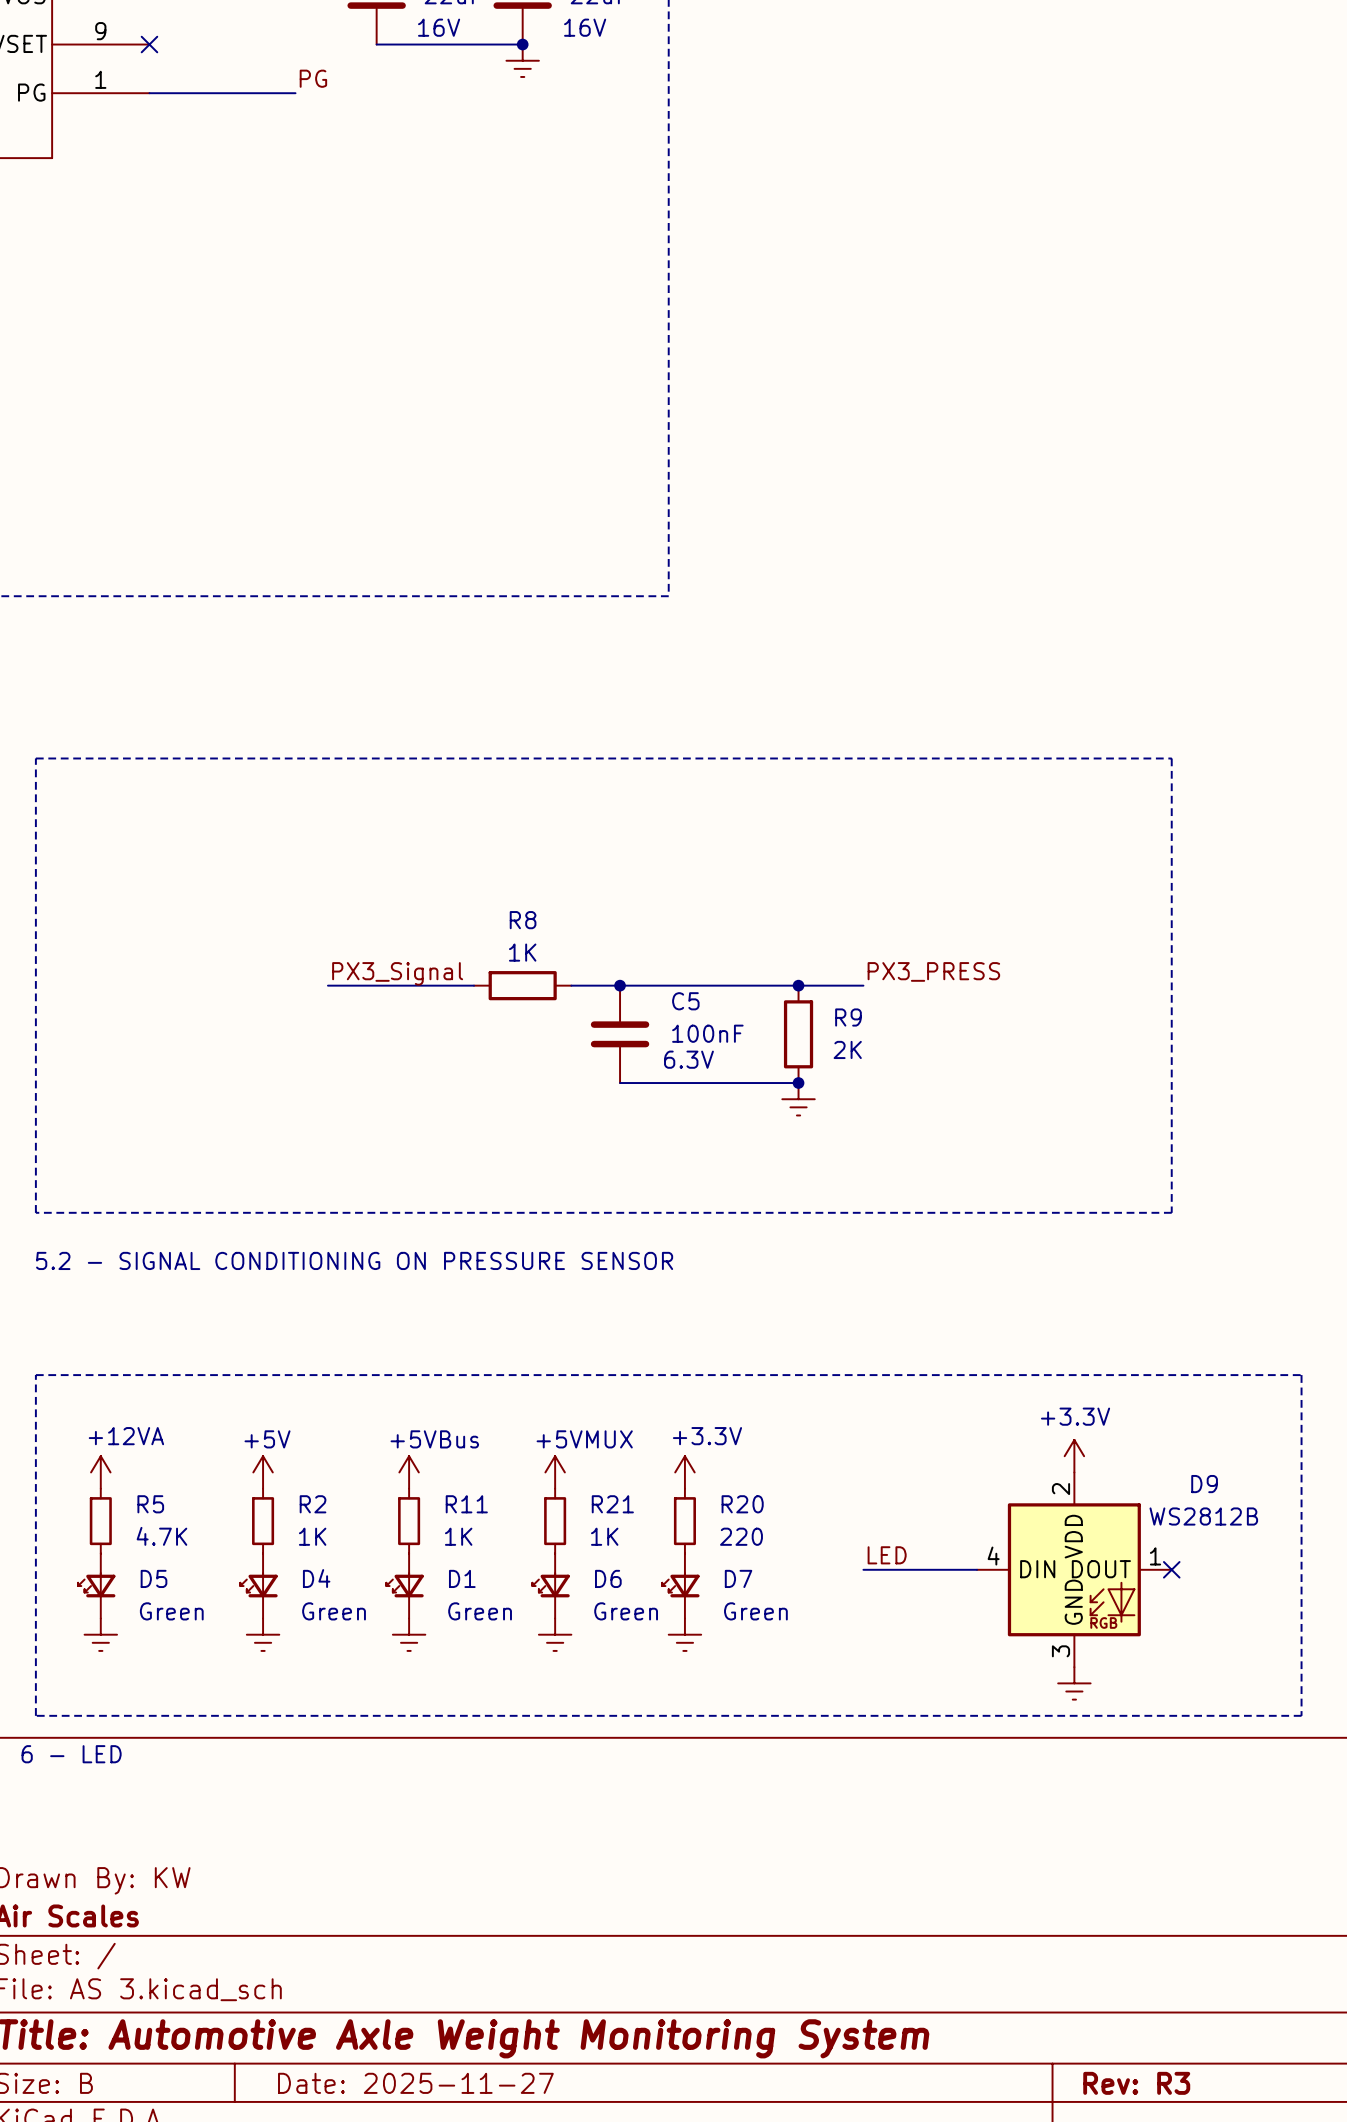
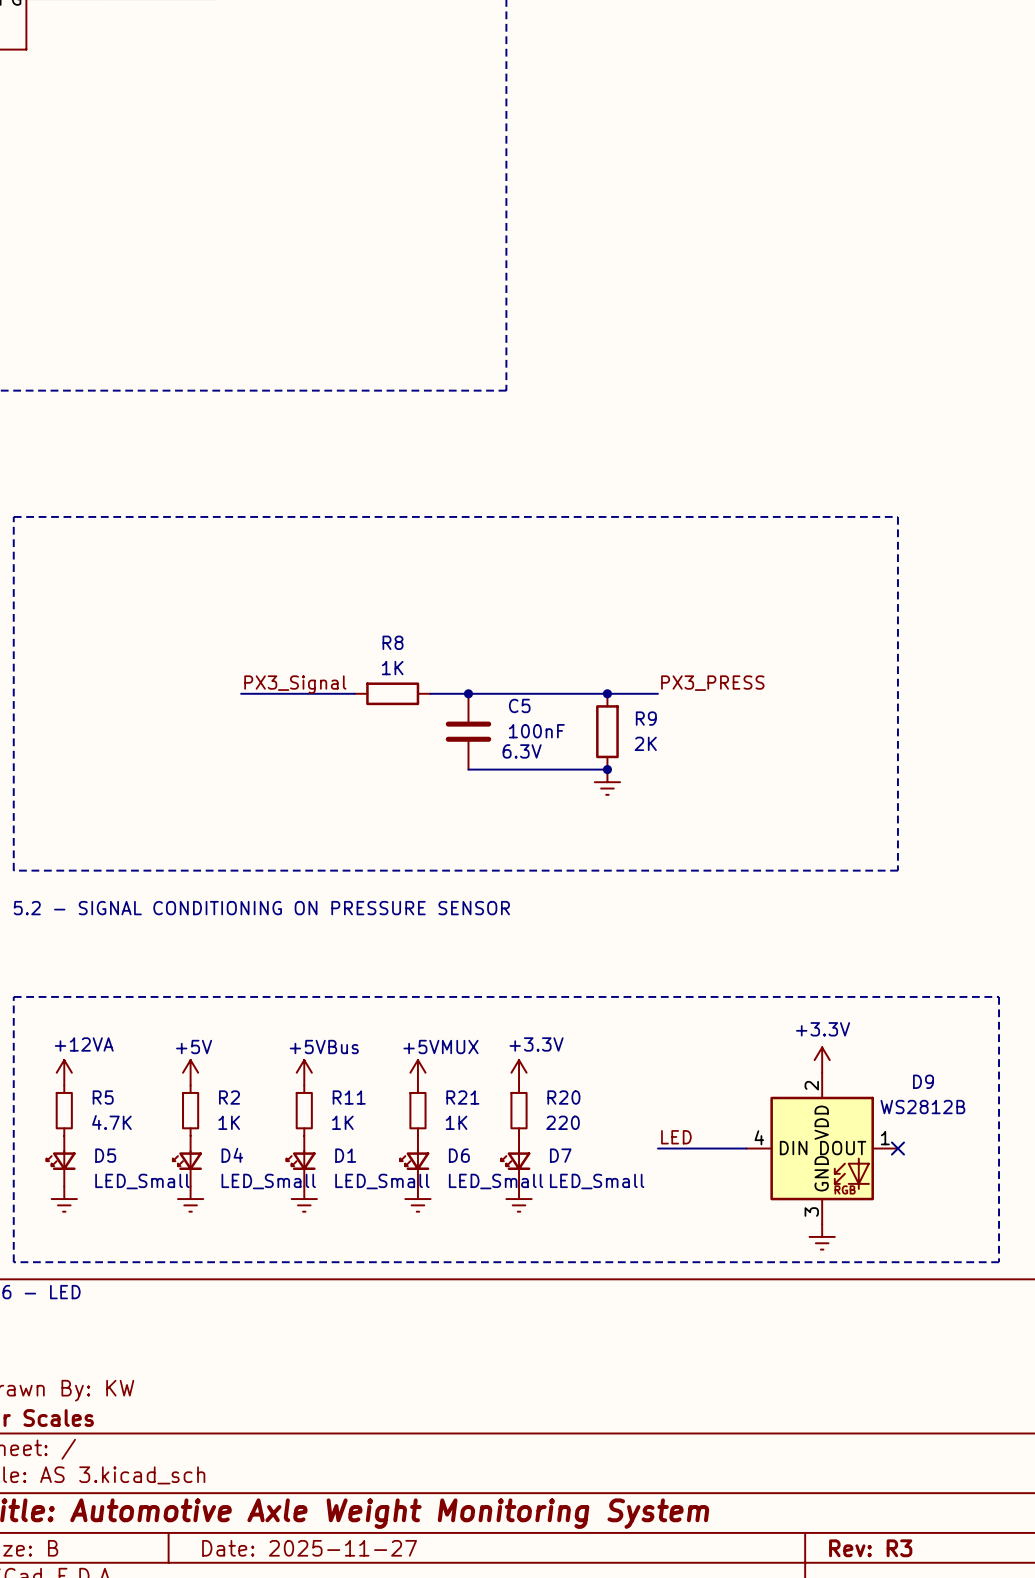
D5 value: Green (171, 1611) -> LED_Small (142, 1181)
D4 value: Green (334, 1611) -> LED_Small (268, 1181)
D1 value: Green (480, 1611) -> LED_Small (382, 1181)
D6 value: Green (626, 1611) -> LED_Small (496, 1181)
D7 value: Green (755, 1611) -> LED_Small (597, 1181)

